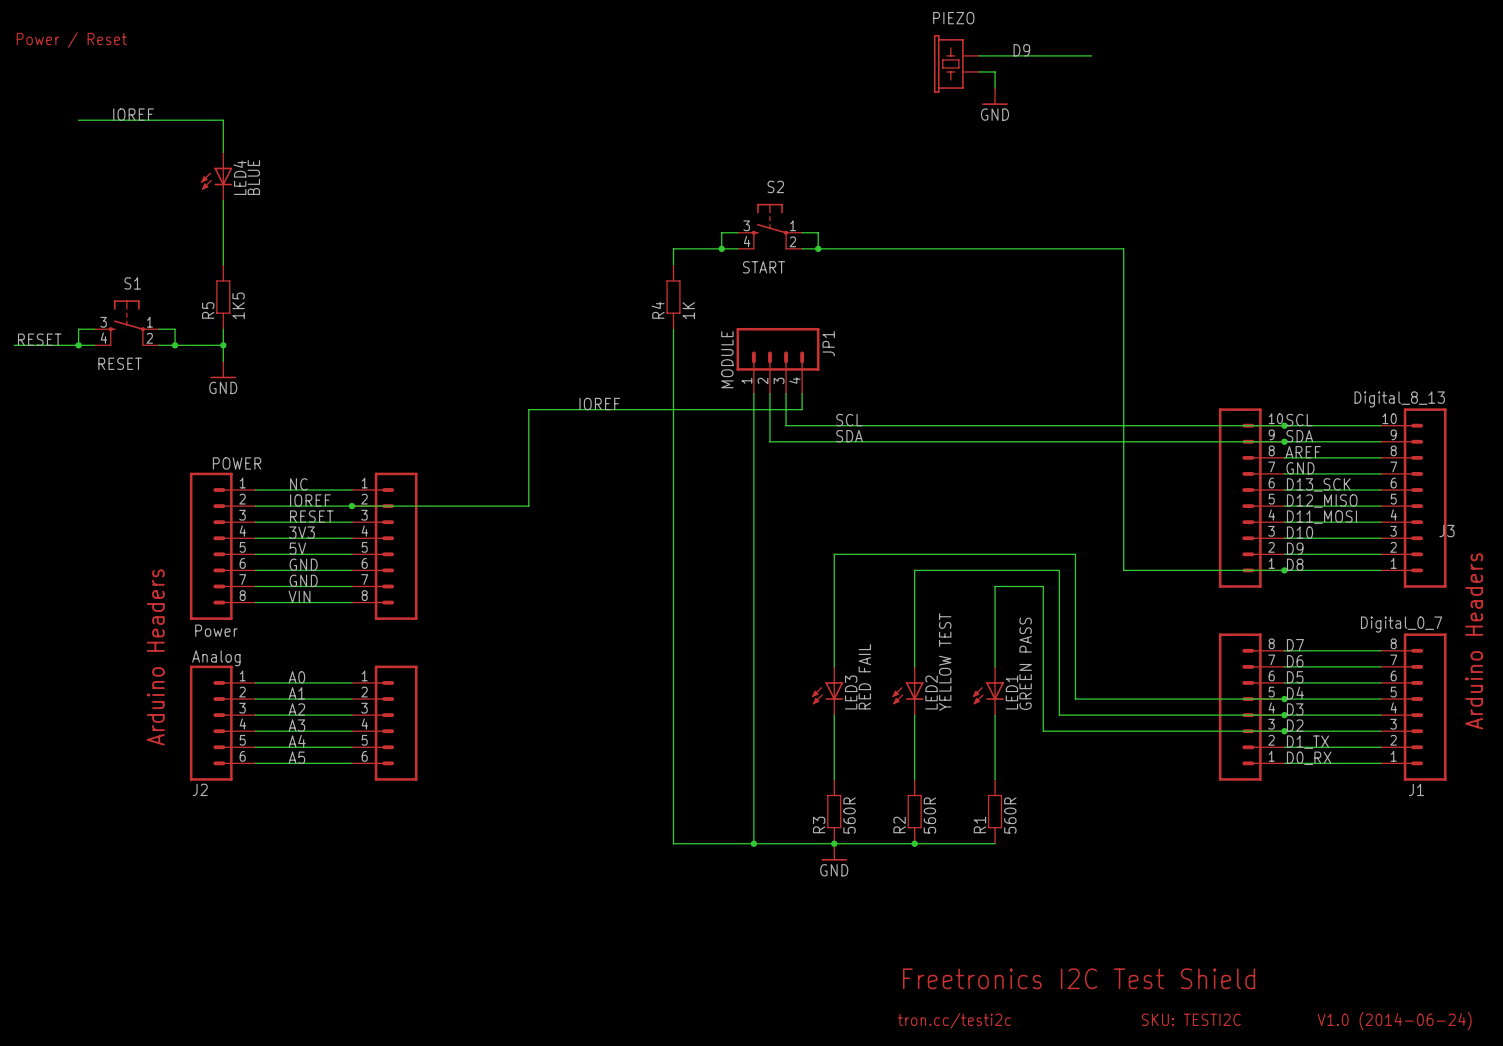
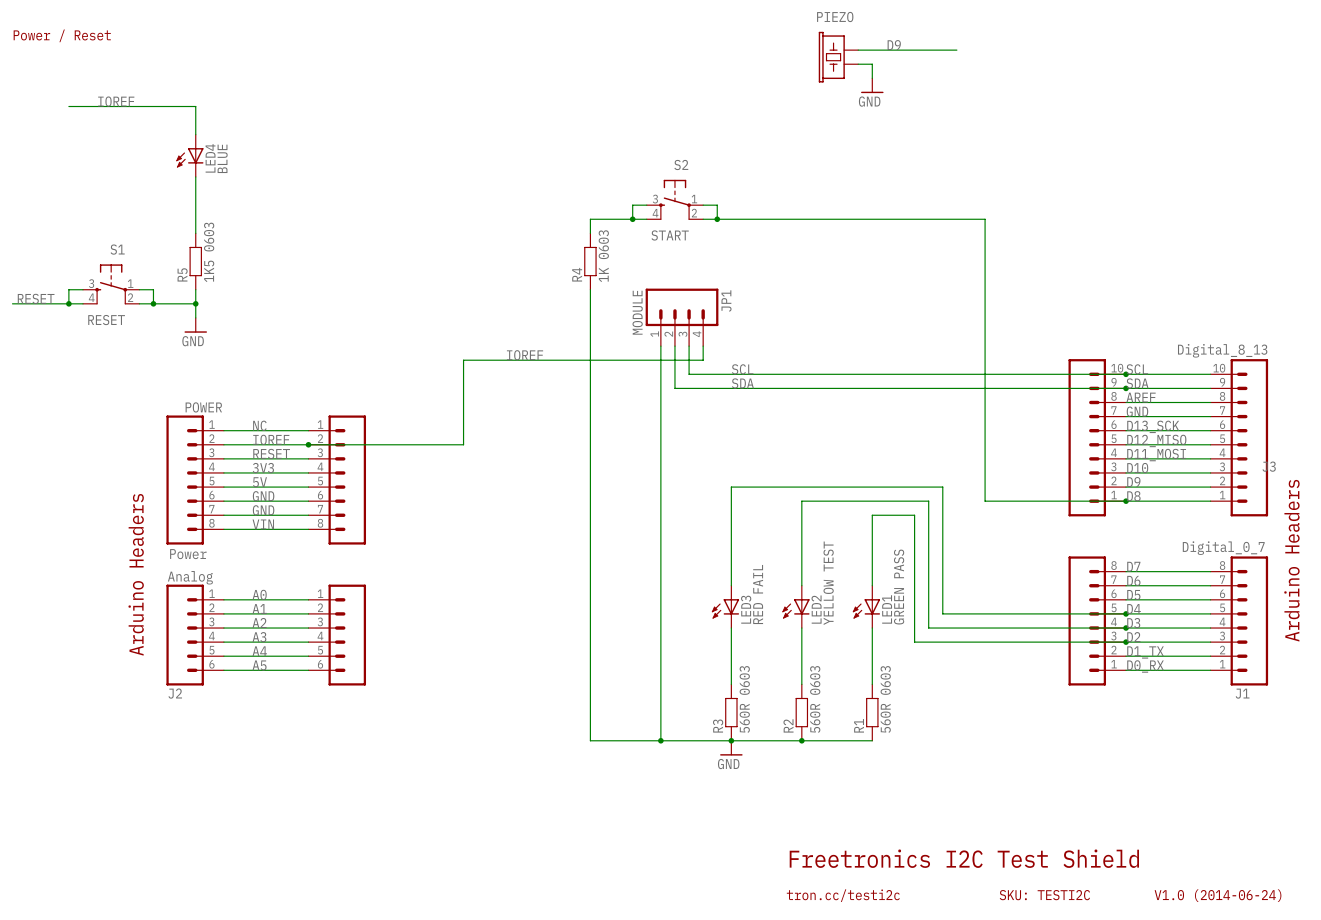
R5 value: 1K5 (238, 305) -> 1K5 0603 (209, 252)
R4 value: 1K (688, 310) -> 1K 0603 (603, 256)
R3 value: 560R (849, 815) -> 560R 0603 (744, 699)
R2 value: 560R (929, 815) -> 560R 0603 (815, 699)
R1 value: 560R (1010, 815) -> 560R 0603 (885, 699)

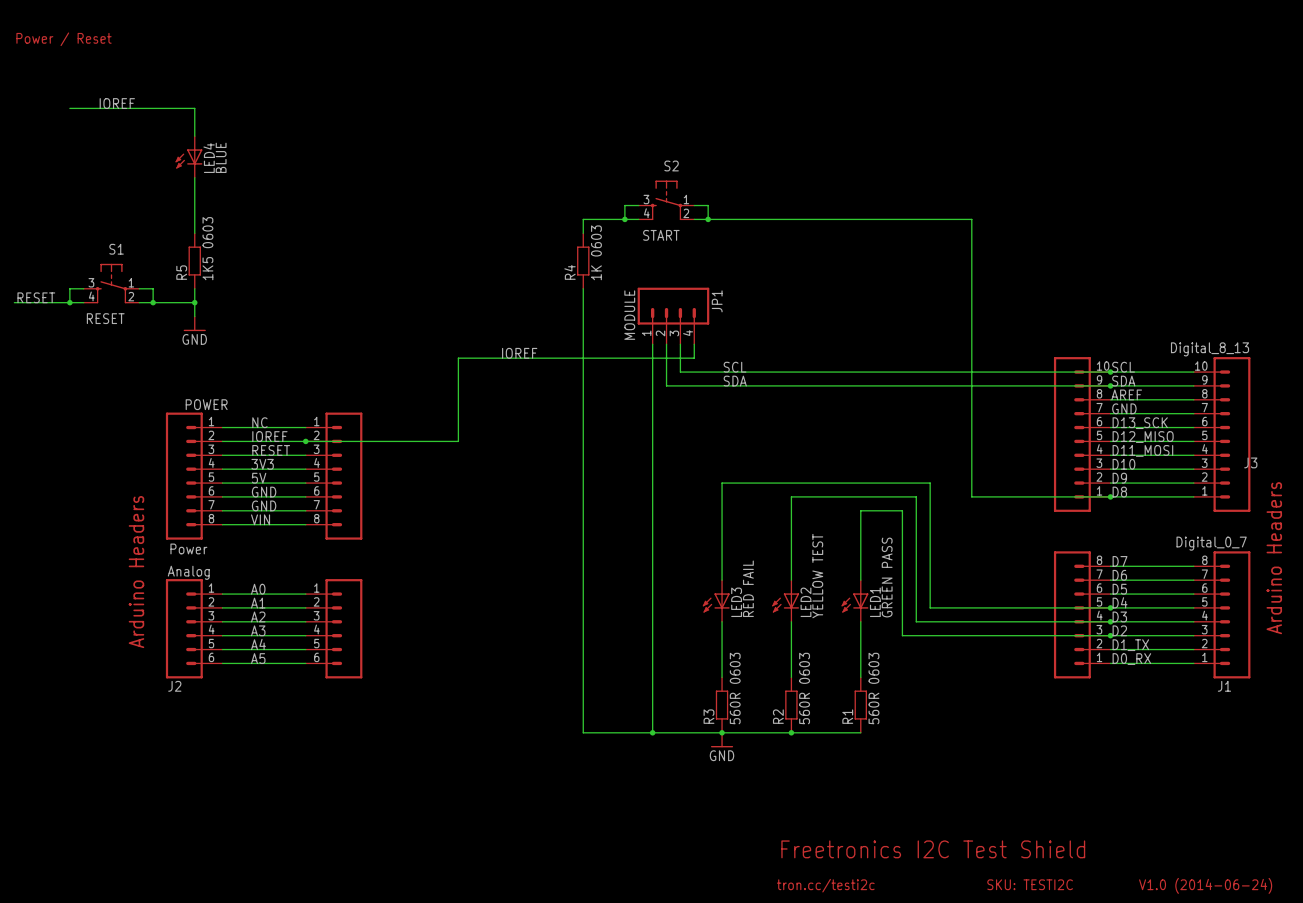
label: D9 (894, 45) -> none
wire: (858, 50) (956, 50) -> none
PIEZO: (838, 57) -> none
wire: (858, 64) (872, 64) (872, 78) -> none
power symbol: GND (872, 85) -> none

